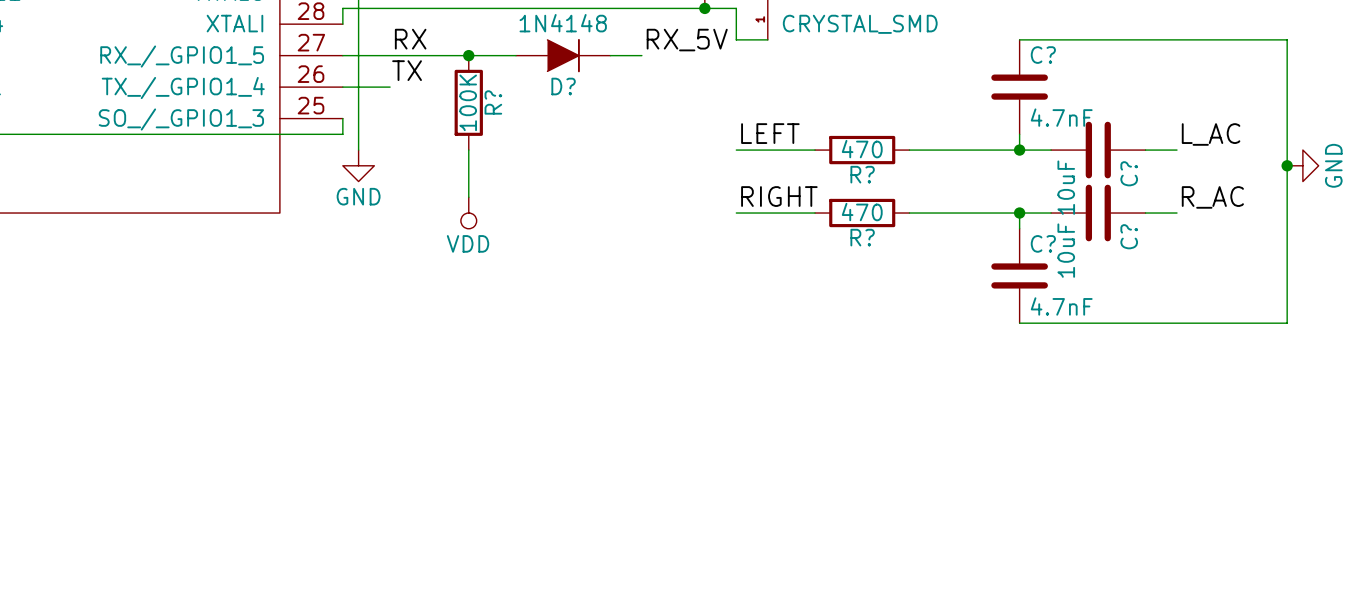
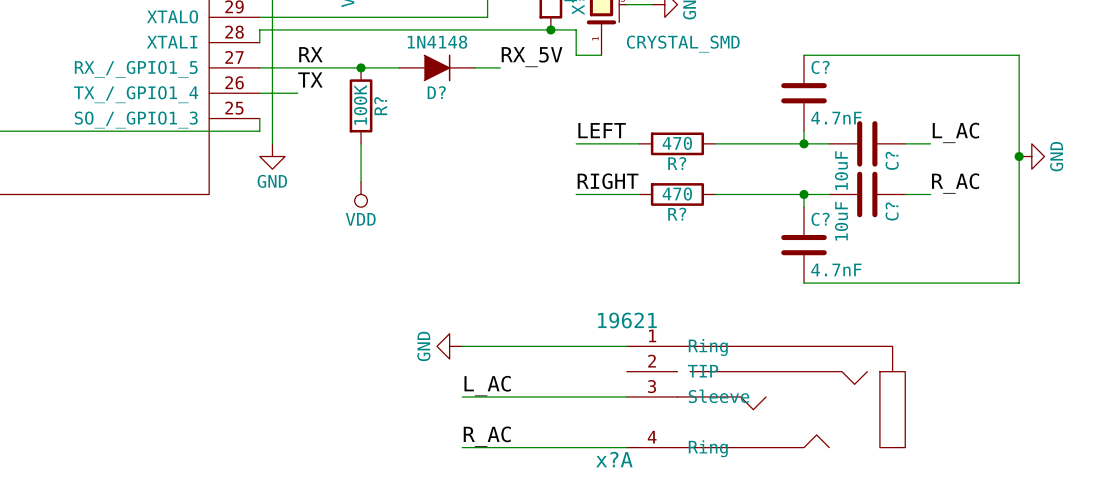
power symbol: none -> GND (449, 346)
wire: none -> (462, 346) (626, 346)
label: none -> L_AC (487, 386)
wire: none -> (462, 396) (626, 396)
x?A: none -> 19621 (766, 396)
label: none -> R_AC (487, 436)
wire: none -> (462, 447) (626, 447)

